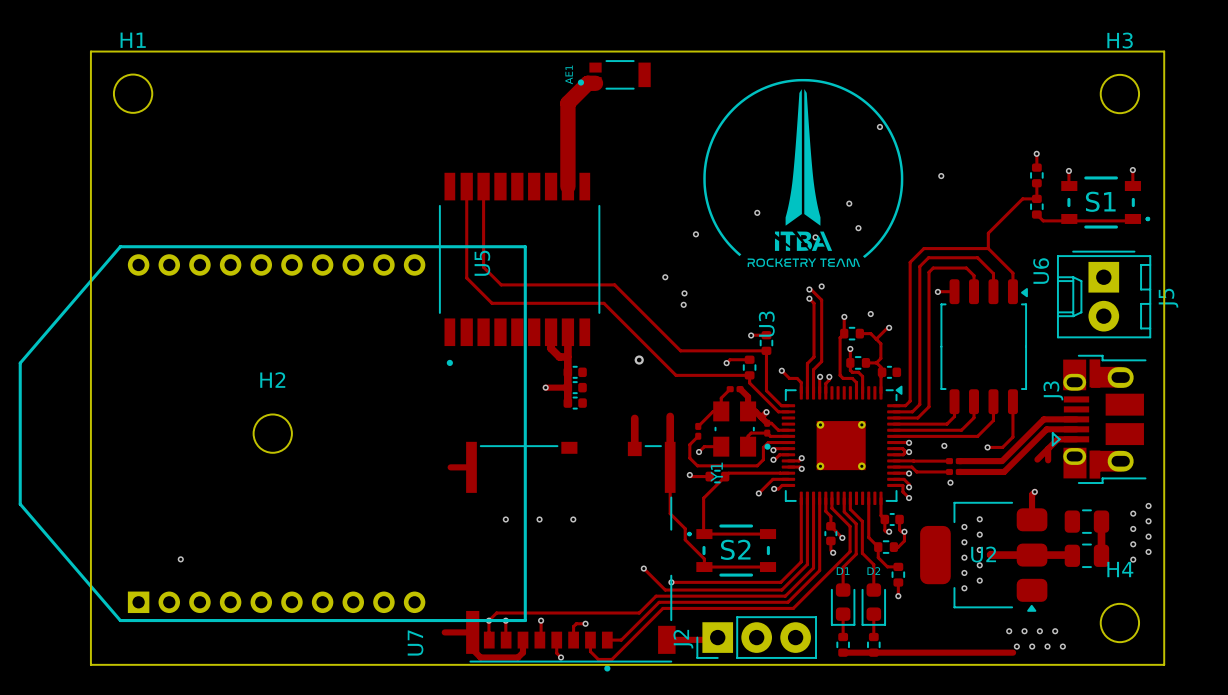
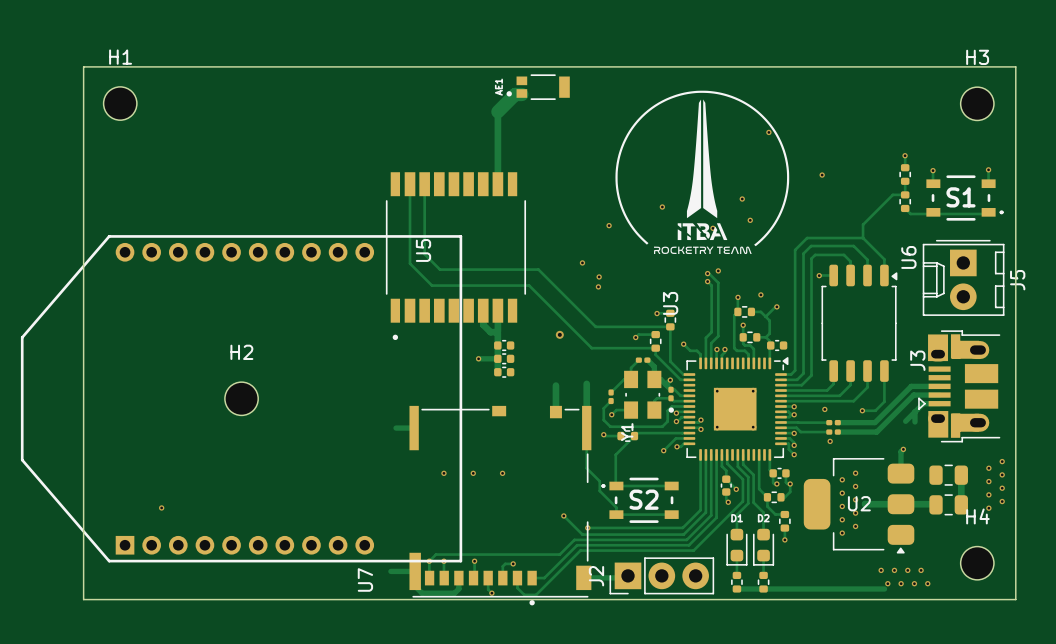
track width: thick (567, 103) (567, 186) -> thin (497, 111) (497, 184)

